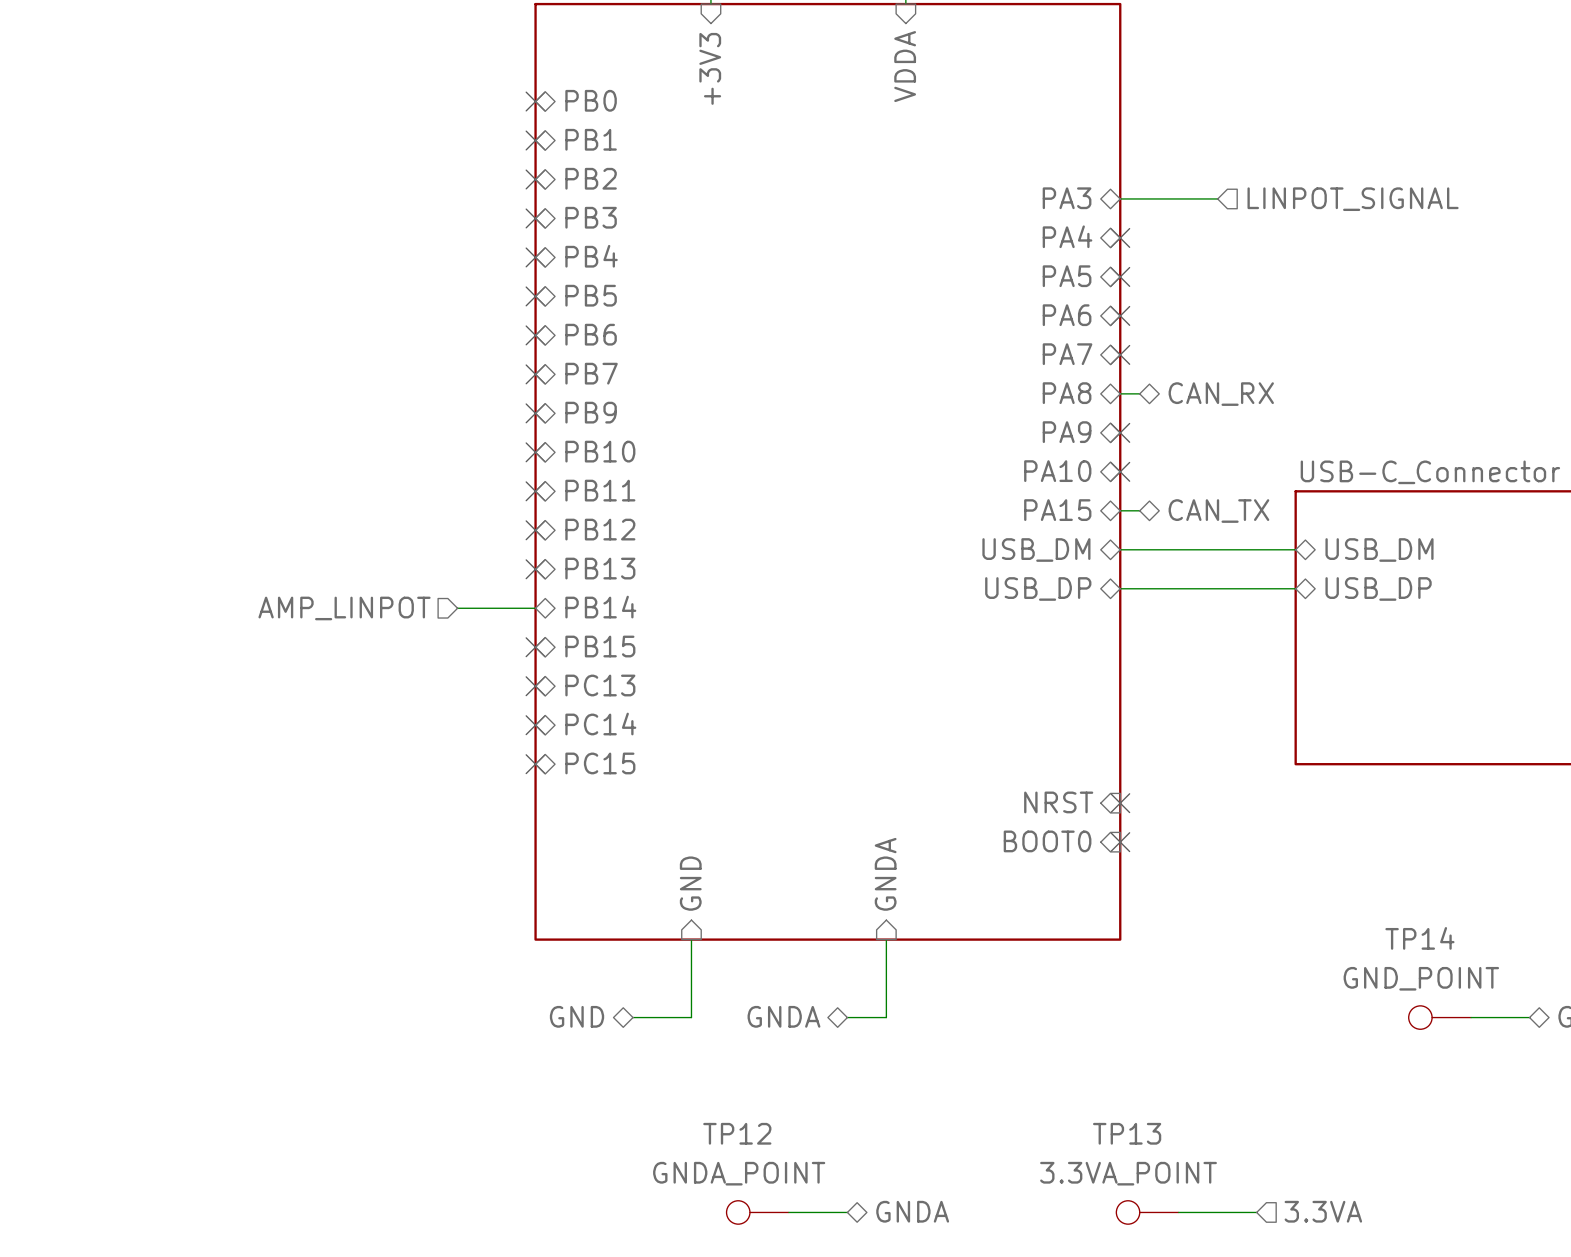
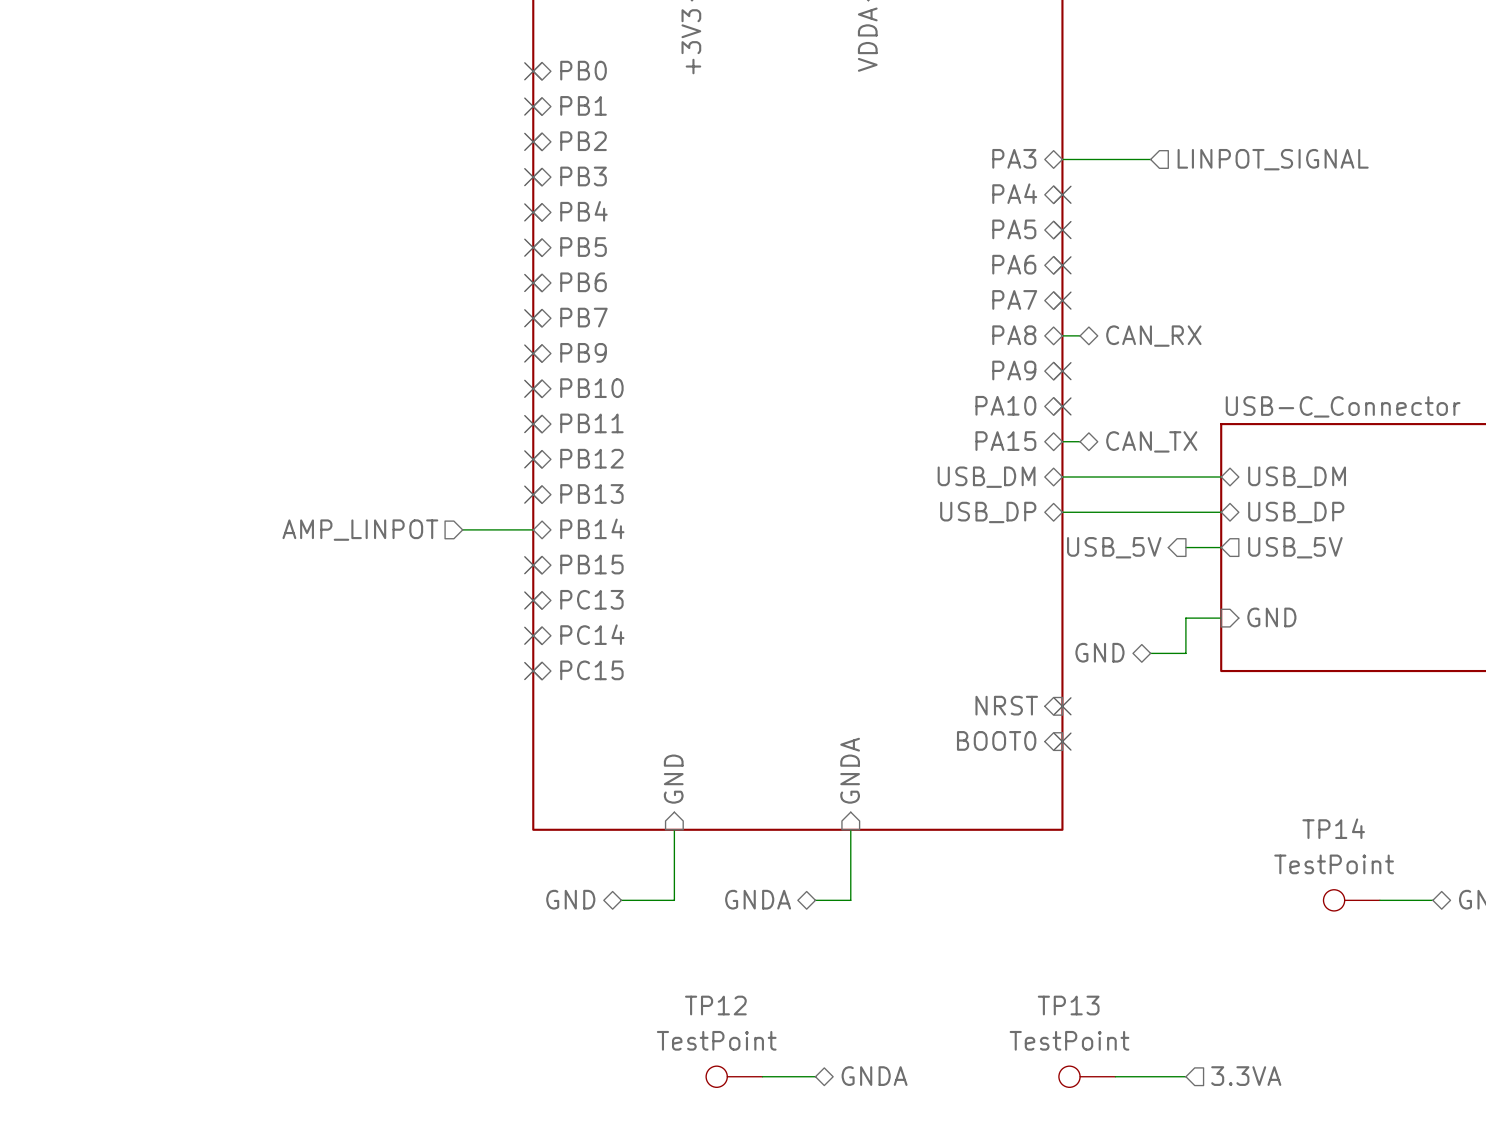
hierarchical label: none -> USB_5V (1114, 547)
wire: none -> (1185, 547) (1221, 547)
sheet pin: none -> USB_5V (1295, 547)
sheet pin: none -> GND (1271, 617)
wire: none -> (1221, 618) (1185, 618) (1185, 653) (1150, 653)
hierarchical label: none -> GND (1099, 652)
TP14 value: GND_POINT (1421, 978) -> TestPoint (1334, 864)
TP12 value: GNDA_POINT (739, 1173) -> TestPoint (716, 1040)
TP13 value: 3.3VA_POINT (1128, 1173) -> TestPoint (1069, 1040)

